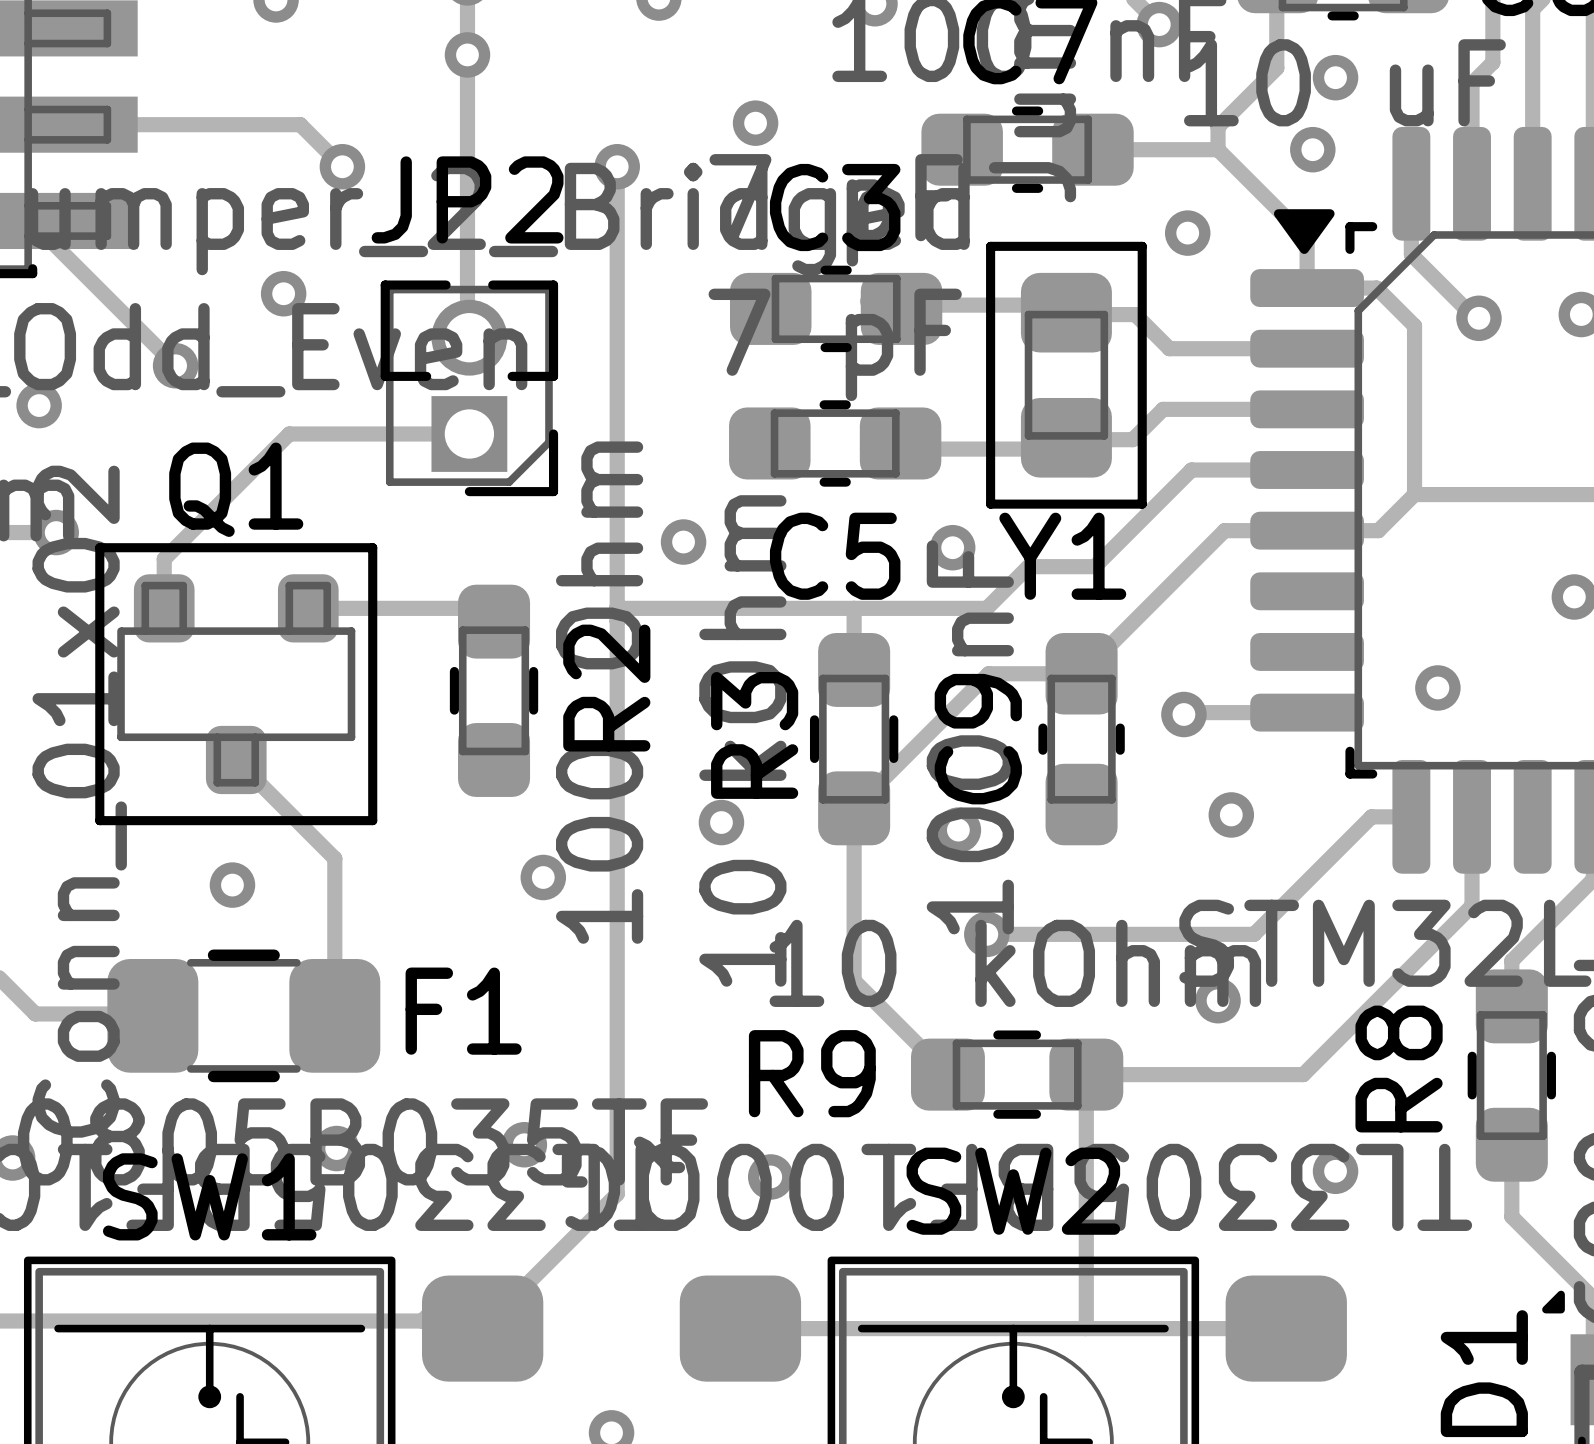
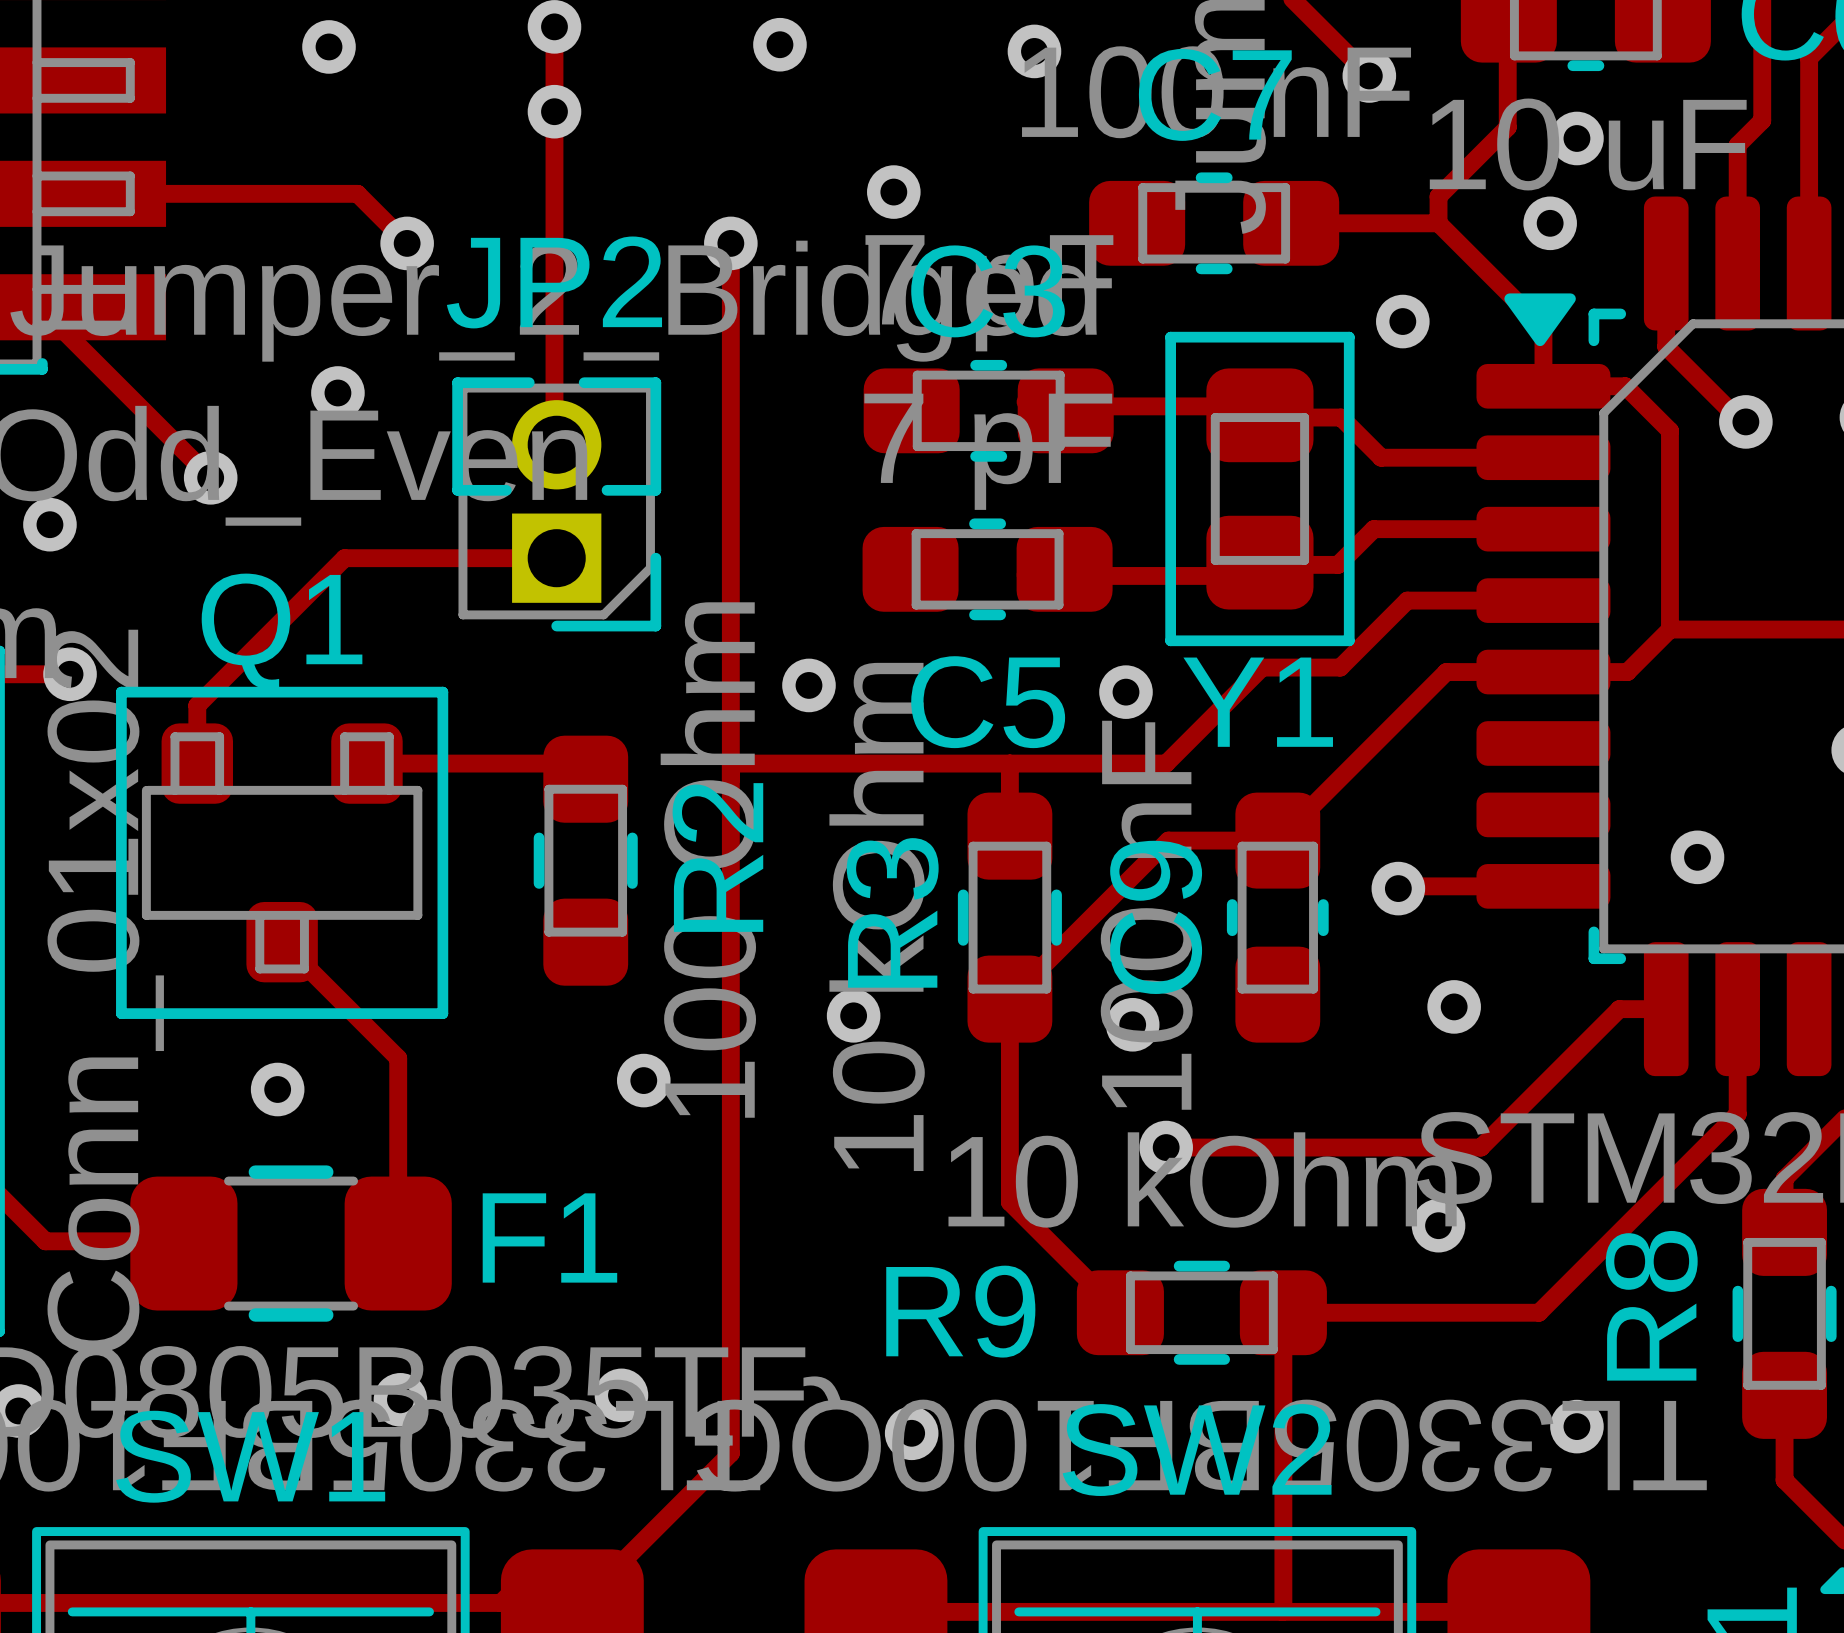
track: (1134, 526) (1094, 566) (1028, 566) -> (1340, 667) (1262, 667) (1215, 714)

